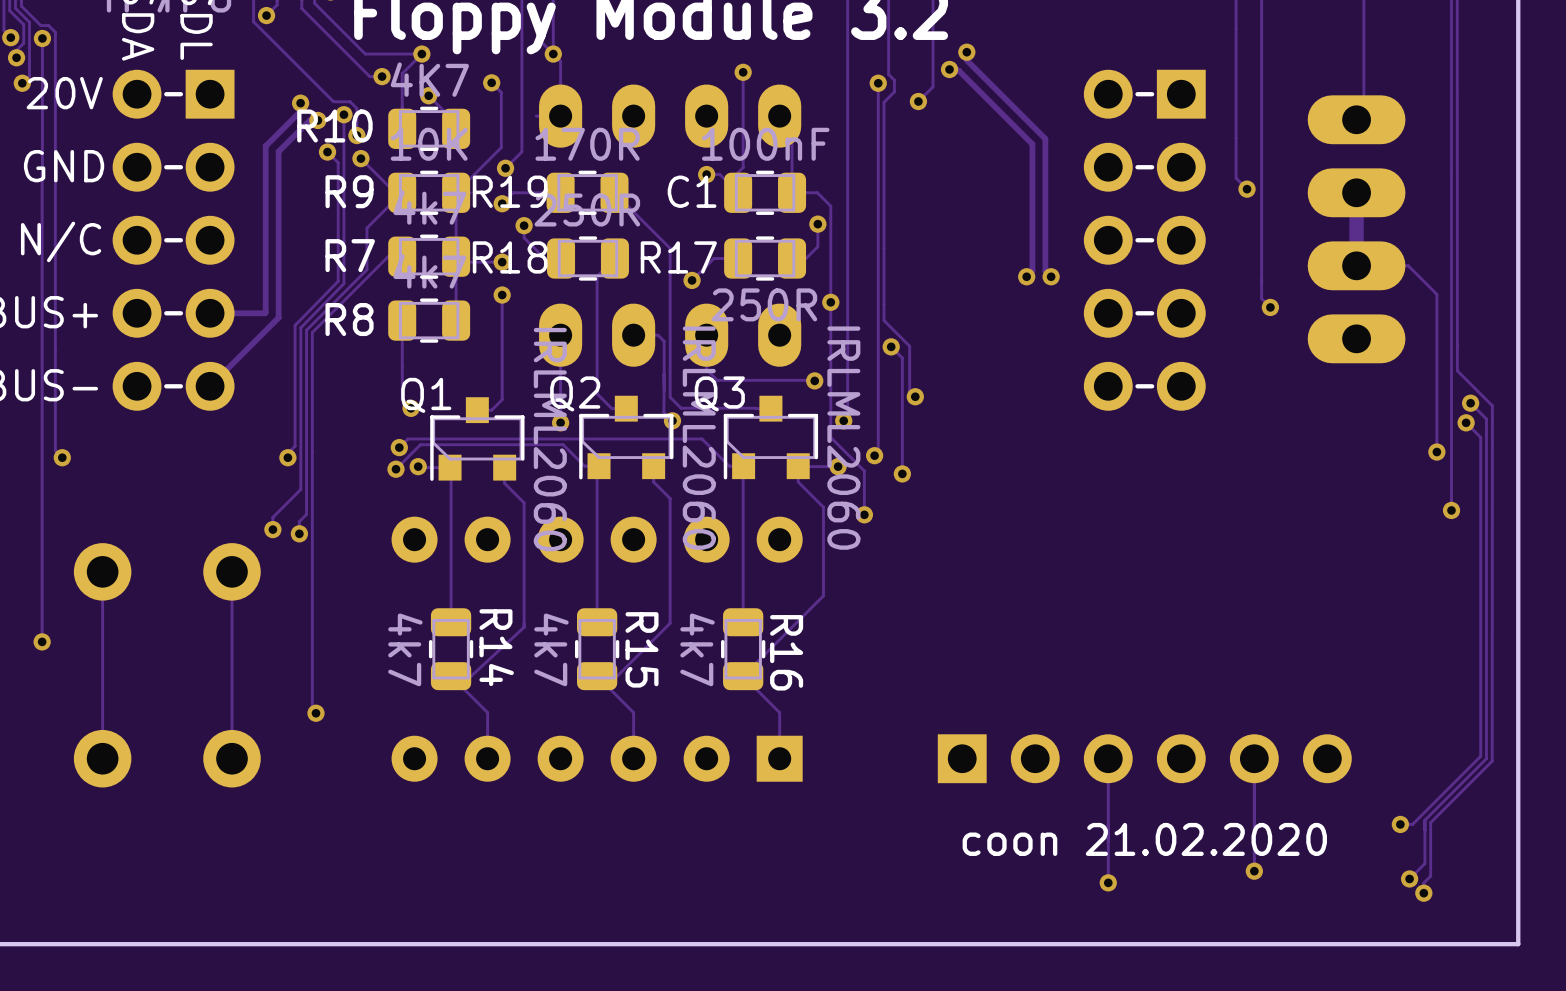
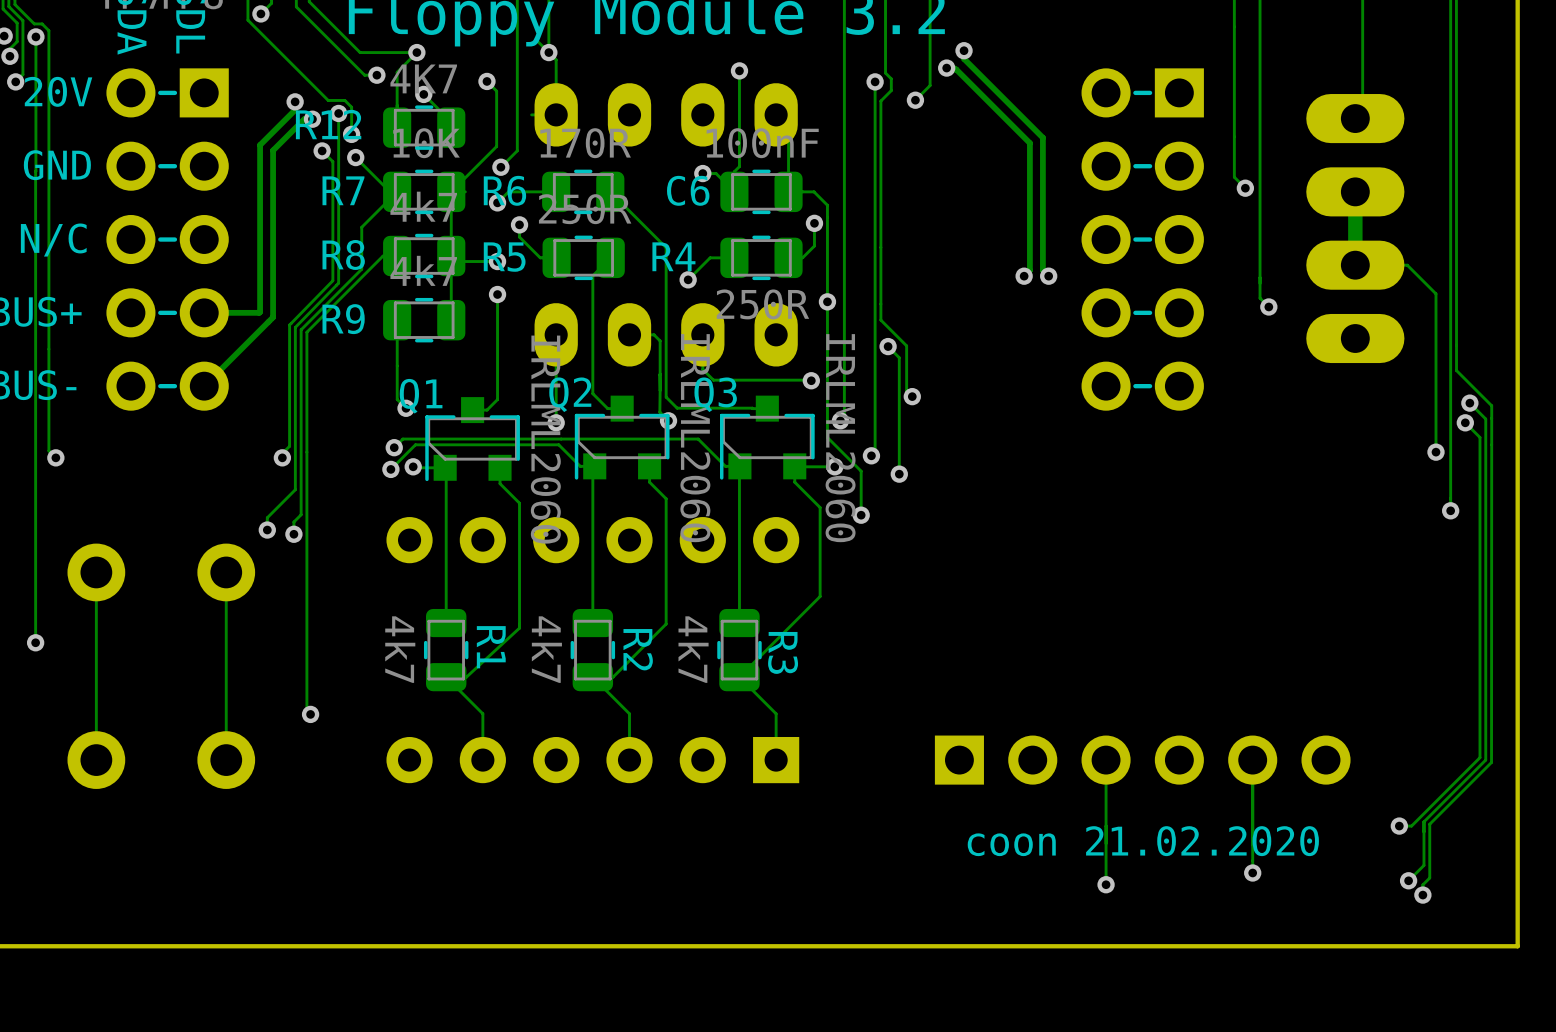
R10 name: R10 (334, 126) -> R12 (328, 124)
R9 name: R9 (349, 191) -> R7 (343, 190)
R19 name: R19 (510, 191) -> R6 (504, 190)
C1 name: C1 (692, 191) -> C6 (688, 190)
R7 name: R7 (350, 255) -> R8 (343, 254)
R18 name: R18 (510, 257) -> R5 (504, 257)
R17 name: R17 (678, 257) -> R4 (673, 256)
R8 name: R8 (349, 319) -> R9 (343, 319)
R14 name: R14 (496, 647) -> R1 (491, 647)
R15 name: R15 (642, 649) -> R2 (638, 649)
R16 name: R16 (786, 652) -> R3 (783, 652)

